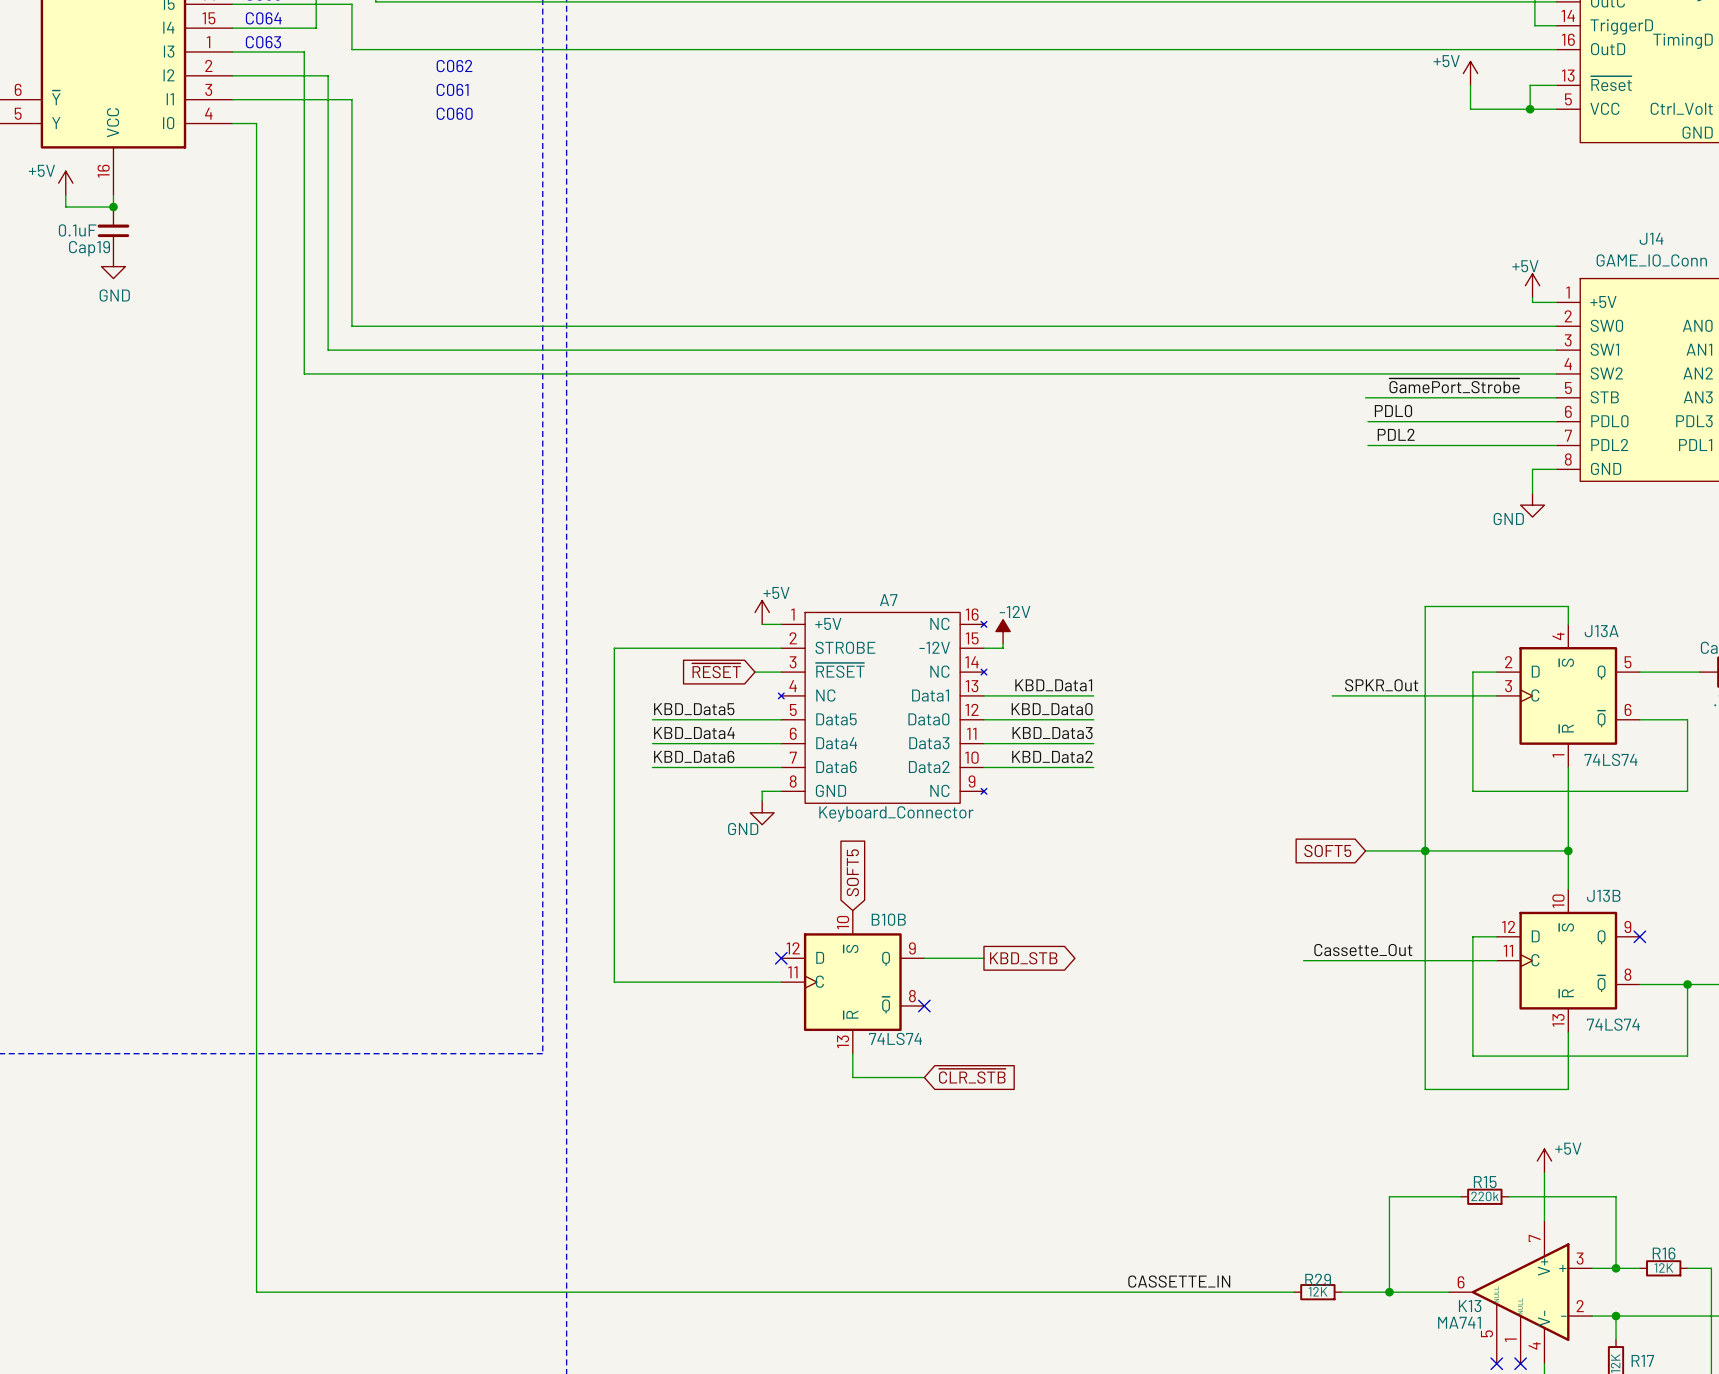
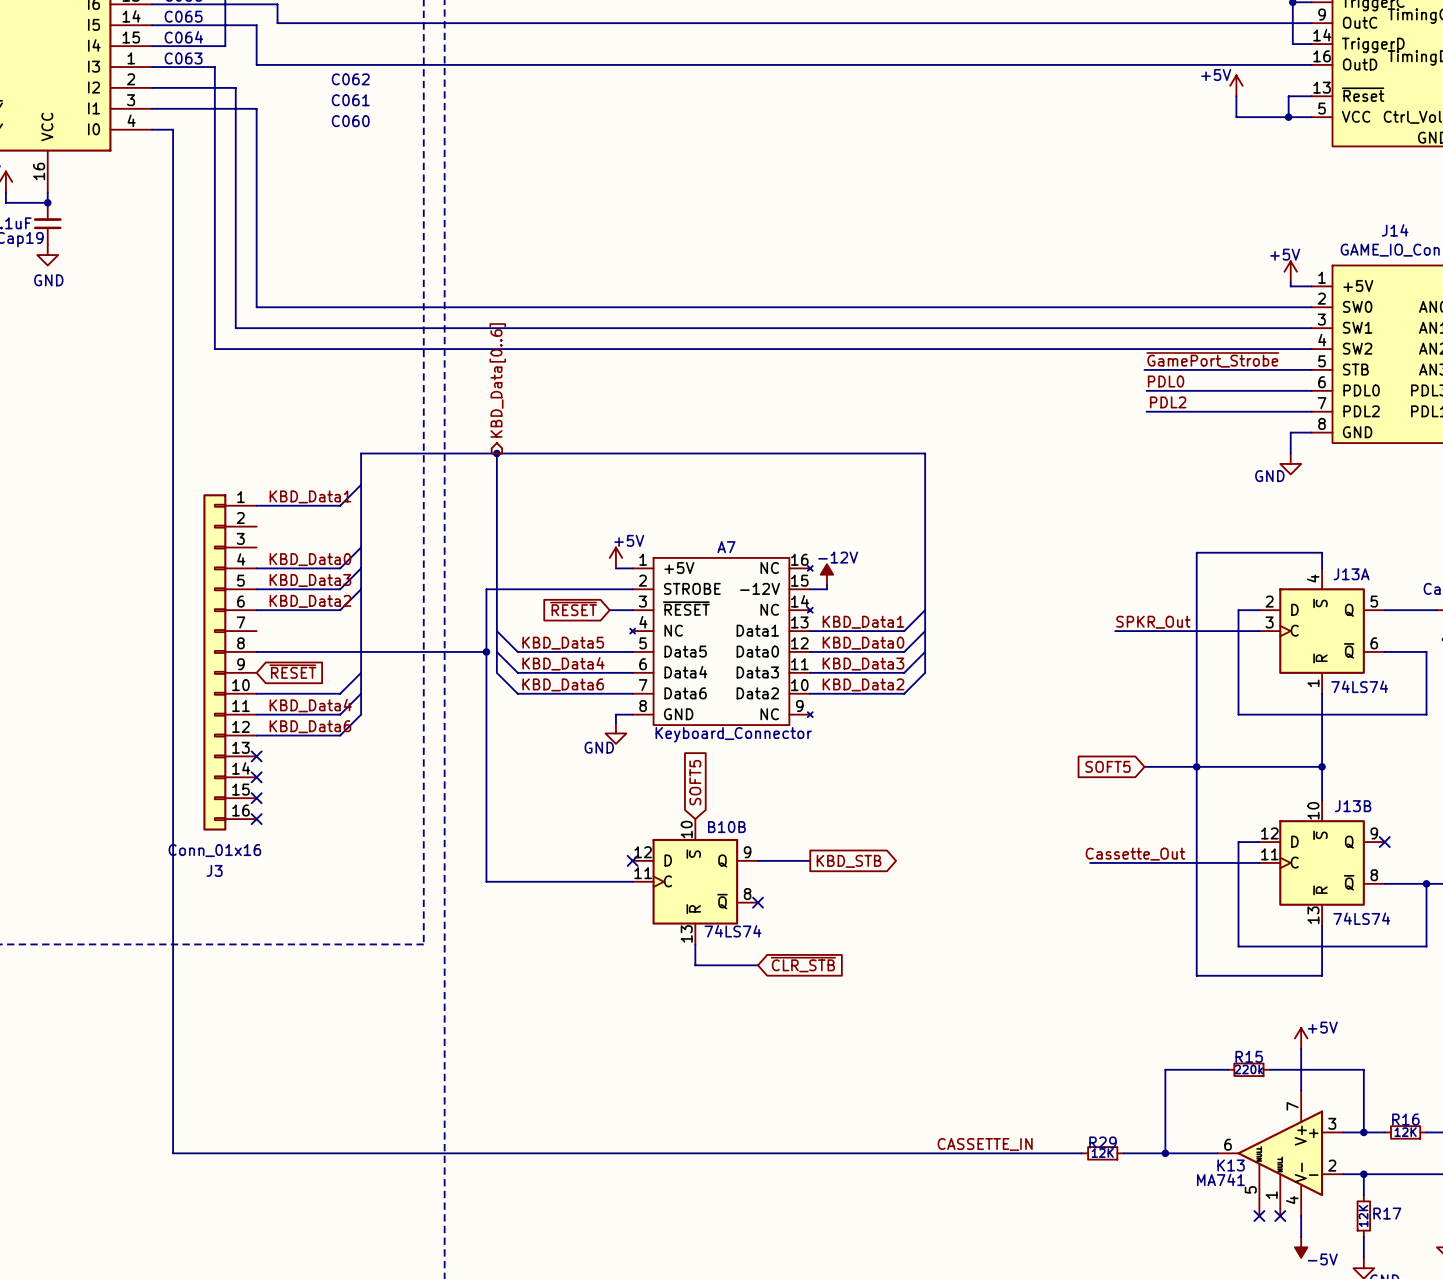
hierarchical label: none -> KBD_Data[0..6] (497, 380)
bus: none -> (496, 453) (496, 672)
junction: none -> (496, 453)
wire: none -> (361, 484) (340, 505) (256, 505)
label: none -> KBD_Data1 (310, 496)
wire: none -> (361, 547) (340, 568) (256, 568)
label: none -> KBD_Data0 (310, 559)
wire: none -> (361, 568) (340, 589) (256, 589)
label: none -> KBD_Data3 (310, 580)
wire: none -> (361, 589) (340, 610) (256, 610)
label: none -> KBD_Data2 (310, 601)
wire: none -> (496, 631) (519, 651)
wire: (1091, 695) (1093, 695) -> (904, 631) (925, 610)
wire: none -> (256, 651) (486, 651)
junction: none -> (486, 651)
wire: none -> (496, 651) (519, 672)
wire: (1091, 719) (1093, 719) -> (904, 651) (925, 631)
J3: none -> Conn_01x16 (230, 662)
global label: none -> ~{RESET} (292, 671)
wire: none -> (361, 672) (340, 693) (256, 693)
wire: none -> (496, 672) (519, 693)
wire: (1091, 743) (1093, 743) -> (904, 672) (925, 651)
bus: none -> (925, 672) (925, 453) (361, 453) (361, 714)
wire: none -> (361, 693) (340, 714) (256, 714)
wire: (1091, 767) (1093, 767) -> (904, 693) (925, 672)
label: none -> KBD_Data4 (310, 705)
wire: none -> (361, 714) (340, 735) (256, 735)
label: none -> KBD_Data6 (310, 726)
no-connect mark: none -> (256, 756)
no-connect mark: none -> (256, 777)
no-connect mark: none -> (256, 798)
no-connect mark: none -> (256, 819)

